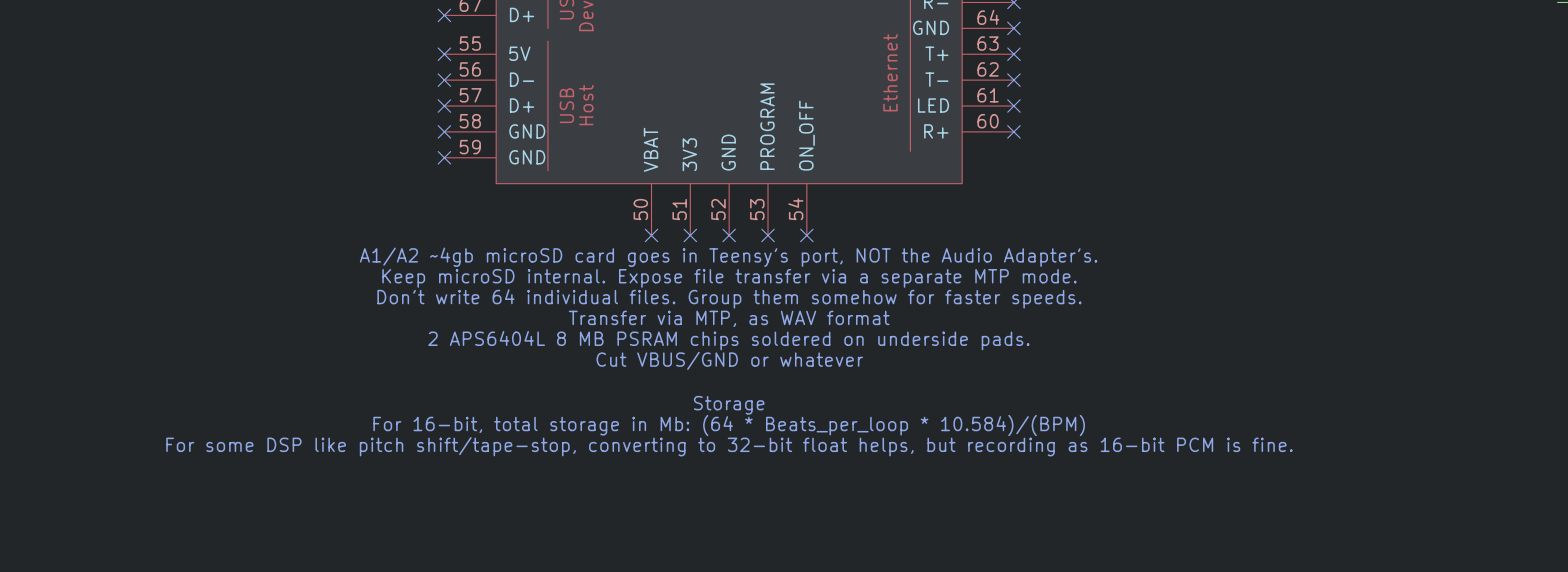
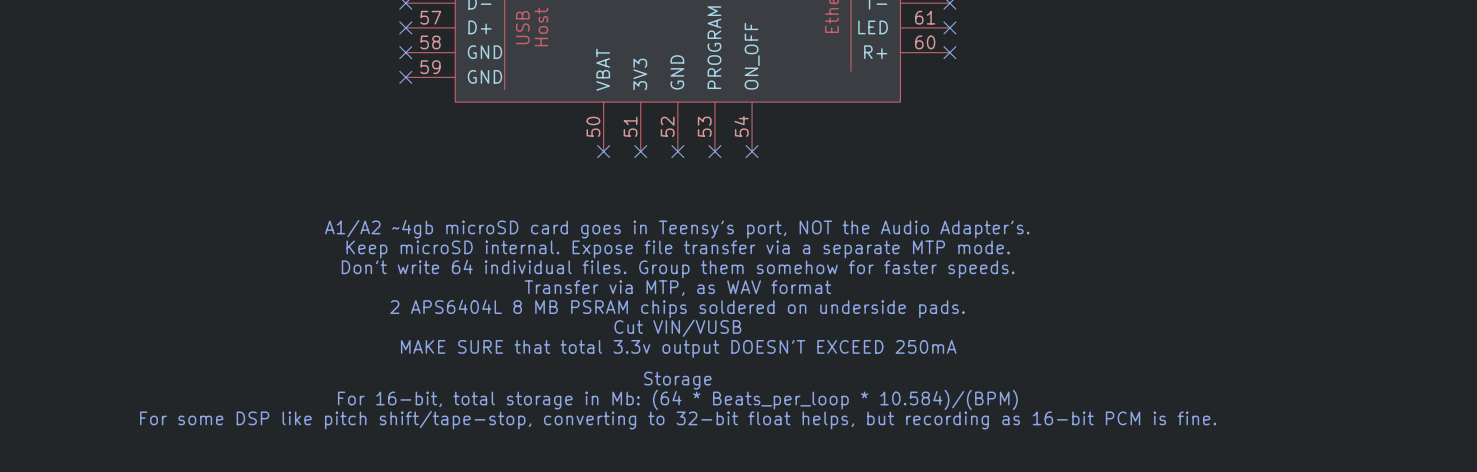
text position: A1/A2 ~4gb microSD card goes in Teensy's port, NOT the Audio Adapter's. (728, 257) -> A1/A2 ~4gb microSD card goes in Teensy's port, NOT the Audio Adapter's. (677, 229)
text position: Keep microSD internal. Expose file transfer via a separate MTP mode. (729, 278) -> Keep microSD internal. Expose file transfer via a separate MTP mode. (678, 249)
text position: Don't write 64 individual files. Group them somehow for faster speeds. (729, 298) -> Don't write 64 individual files. Group them somehow for faster speeds. (678, 269)
text position: Transfer via MTP, as WAV format (729, 318) -> Transfer via MTP, as WAV format (677, 288)
text position: 2 APS6404L 8 MB PSRAM chips soldered on underside pads. (728, 340) -> 2 APS6404L 8 MB PSRAM chips soldered on underside pads. (677, 308)
text: Cut VBUS/GND or whatever (729, 360) -> none
text position: Storage (729, 405) -> Storage (677, 380)
text: none -> Cut VIN/VUSB (677, 328)
text position: For 16-bit, total storage in Mb: (64 * Beats_per_loop * 10.584)/(BPM) (729, 425) -> For 16-bit, total storage in Mb: (64 * Beats_per_loop * 10.584)/(BPM) (677, 399)
text: none -> MAKE SURE that total 3.3v output DOESN'T EXCEED 250mA (678, 348)
text position: For some DSP like pitch shift/tape-stop, converting to 32-bit float helps, but recording as 16-bit PCM is fine. (729, 446) -> For some DSP like pitch shift/tape-stop, converting to 32-bit float helps, but recording as 16-bit PCM is fine. (678, 420)

